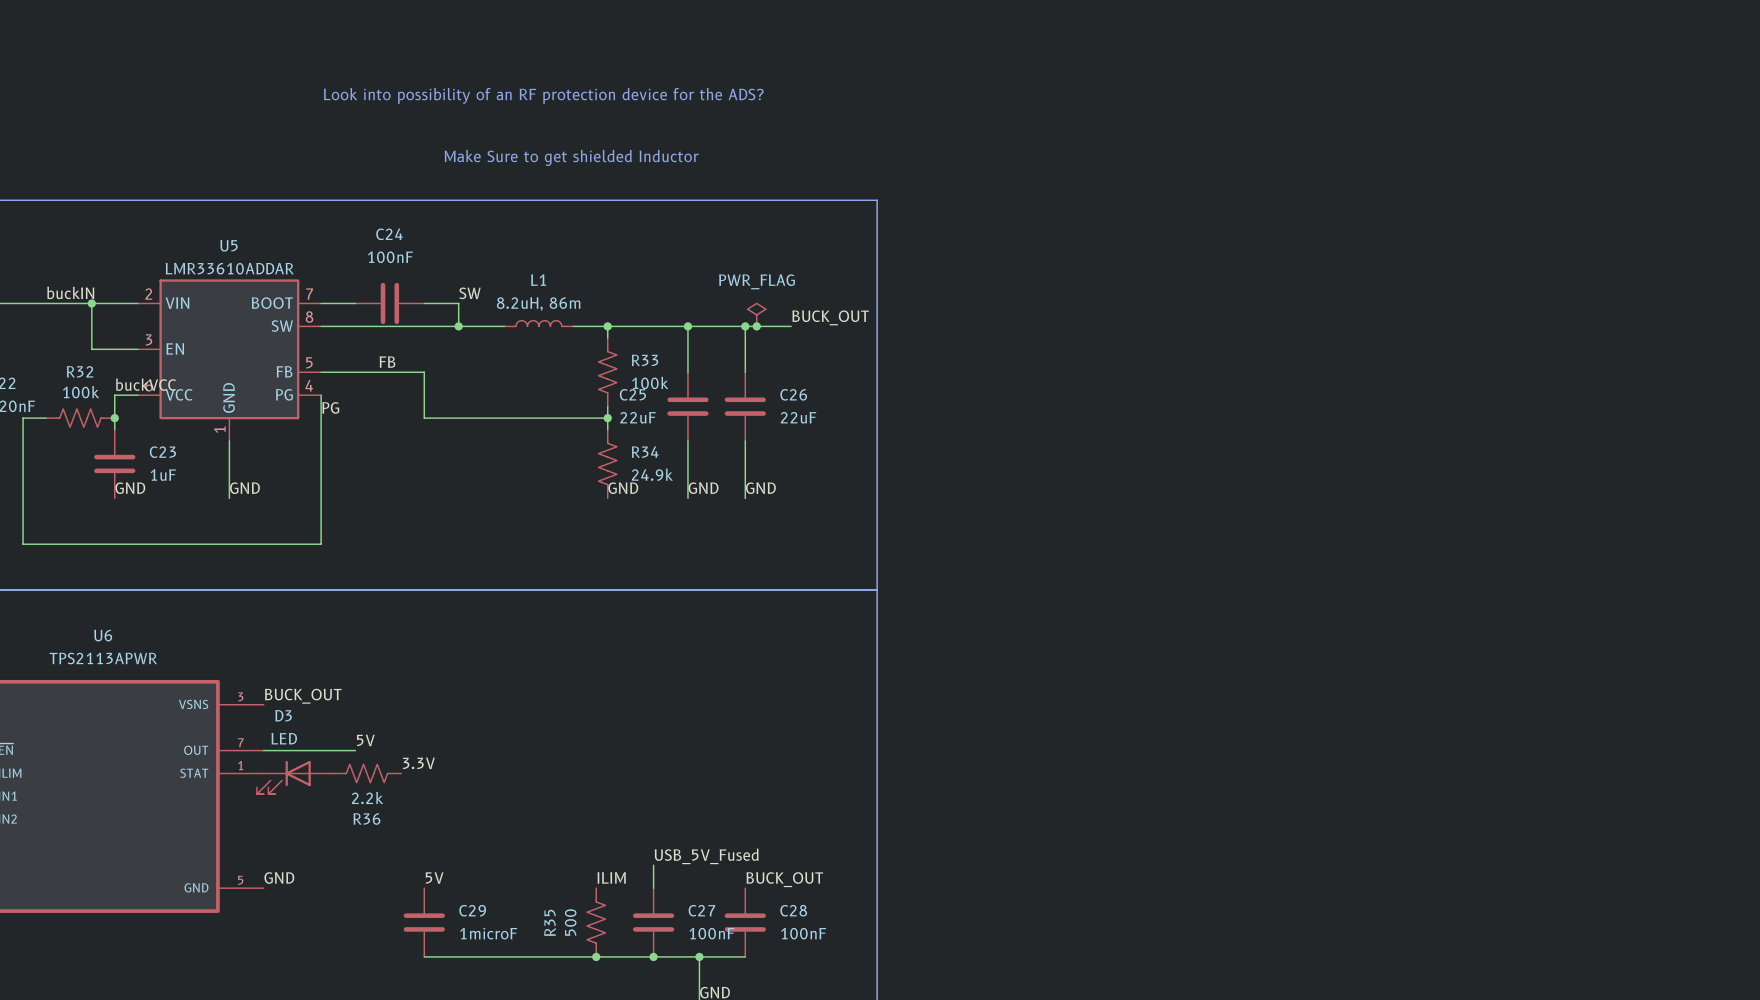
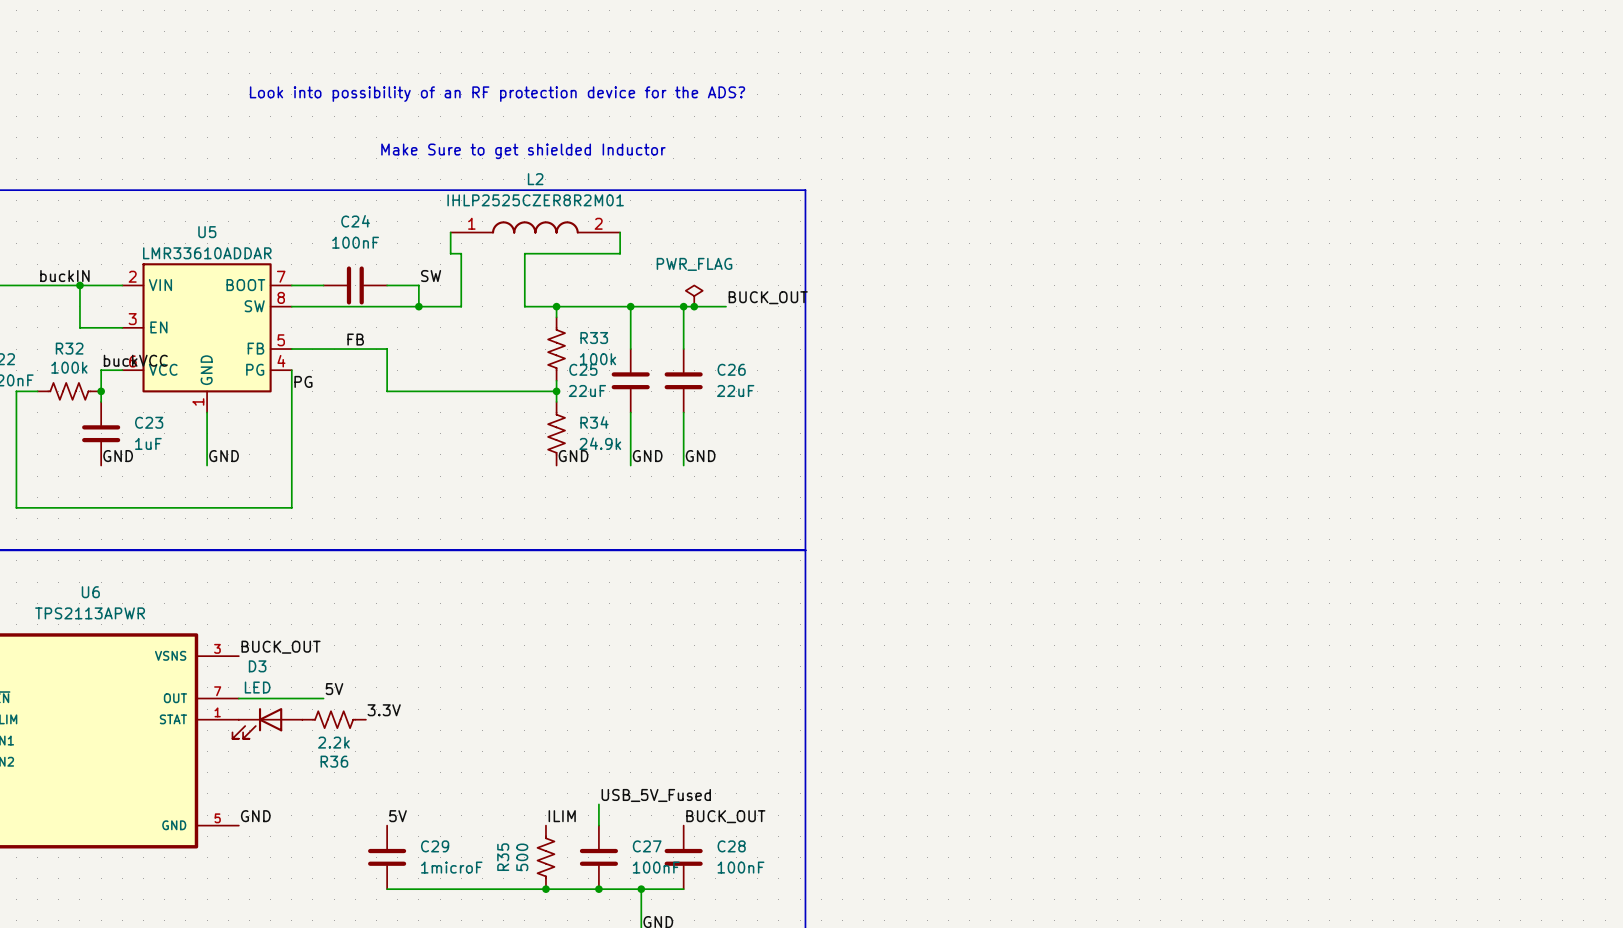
L2: none -> IHLP2525CZER8R2M01 (535, 227)
wire: none -> (450, 232) (450, 253) (461, 253) (461, 306)
wire: none -> (620, 232) (620, 253) (524, 253) (524, 306)
L1: 8.2uH, 86m (538, 323) -> none

